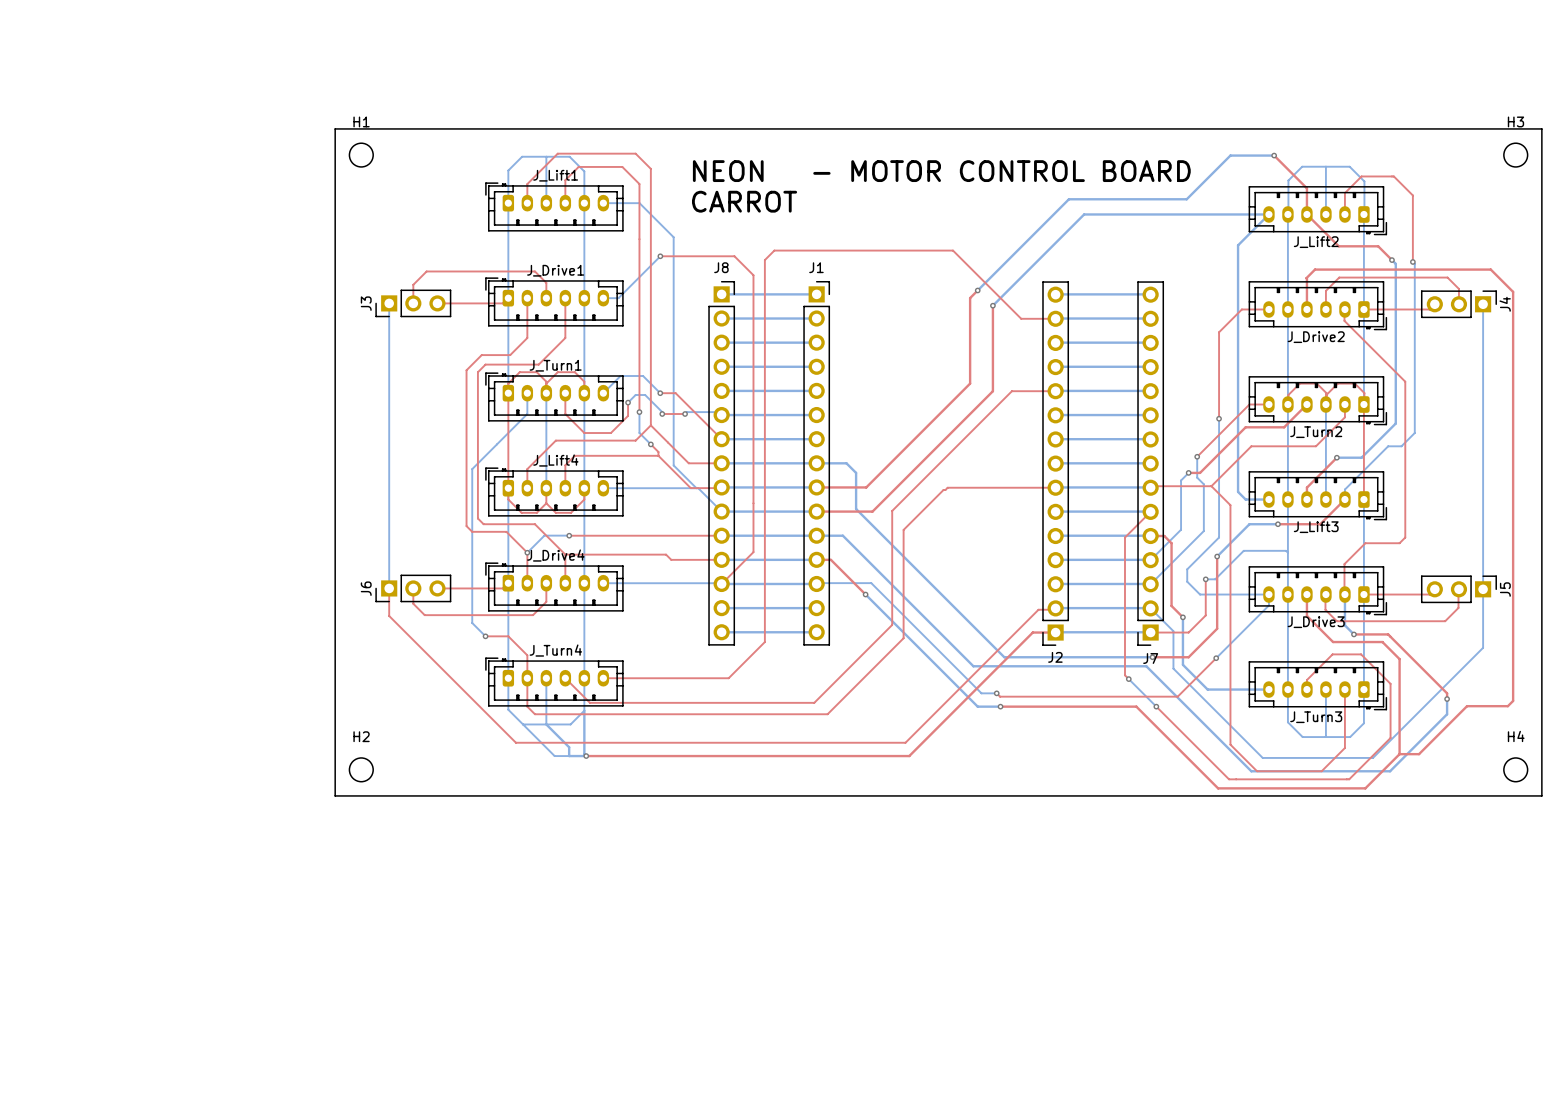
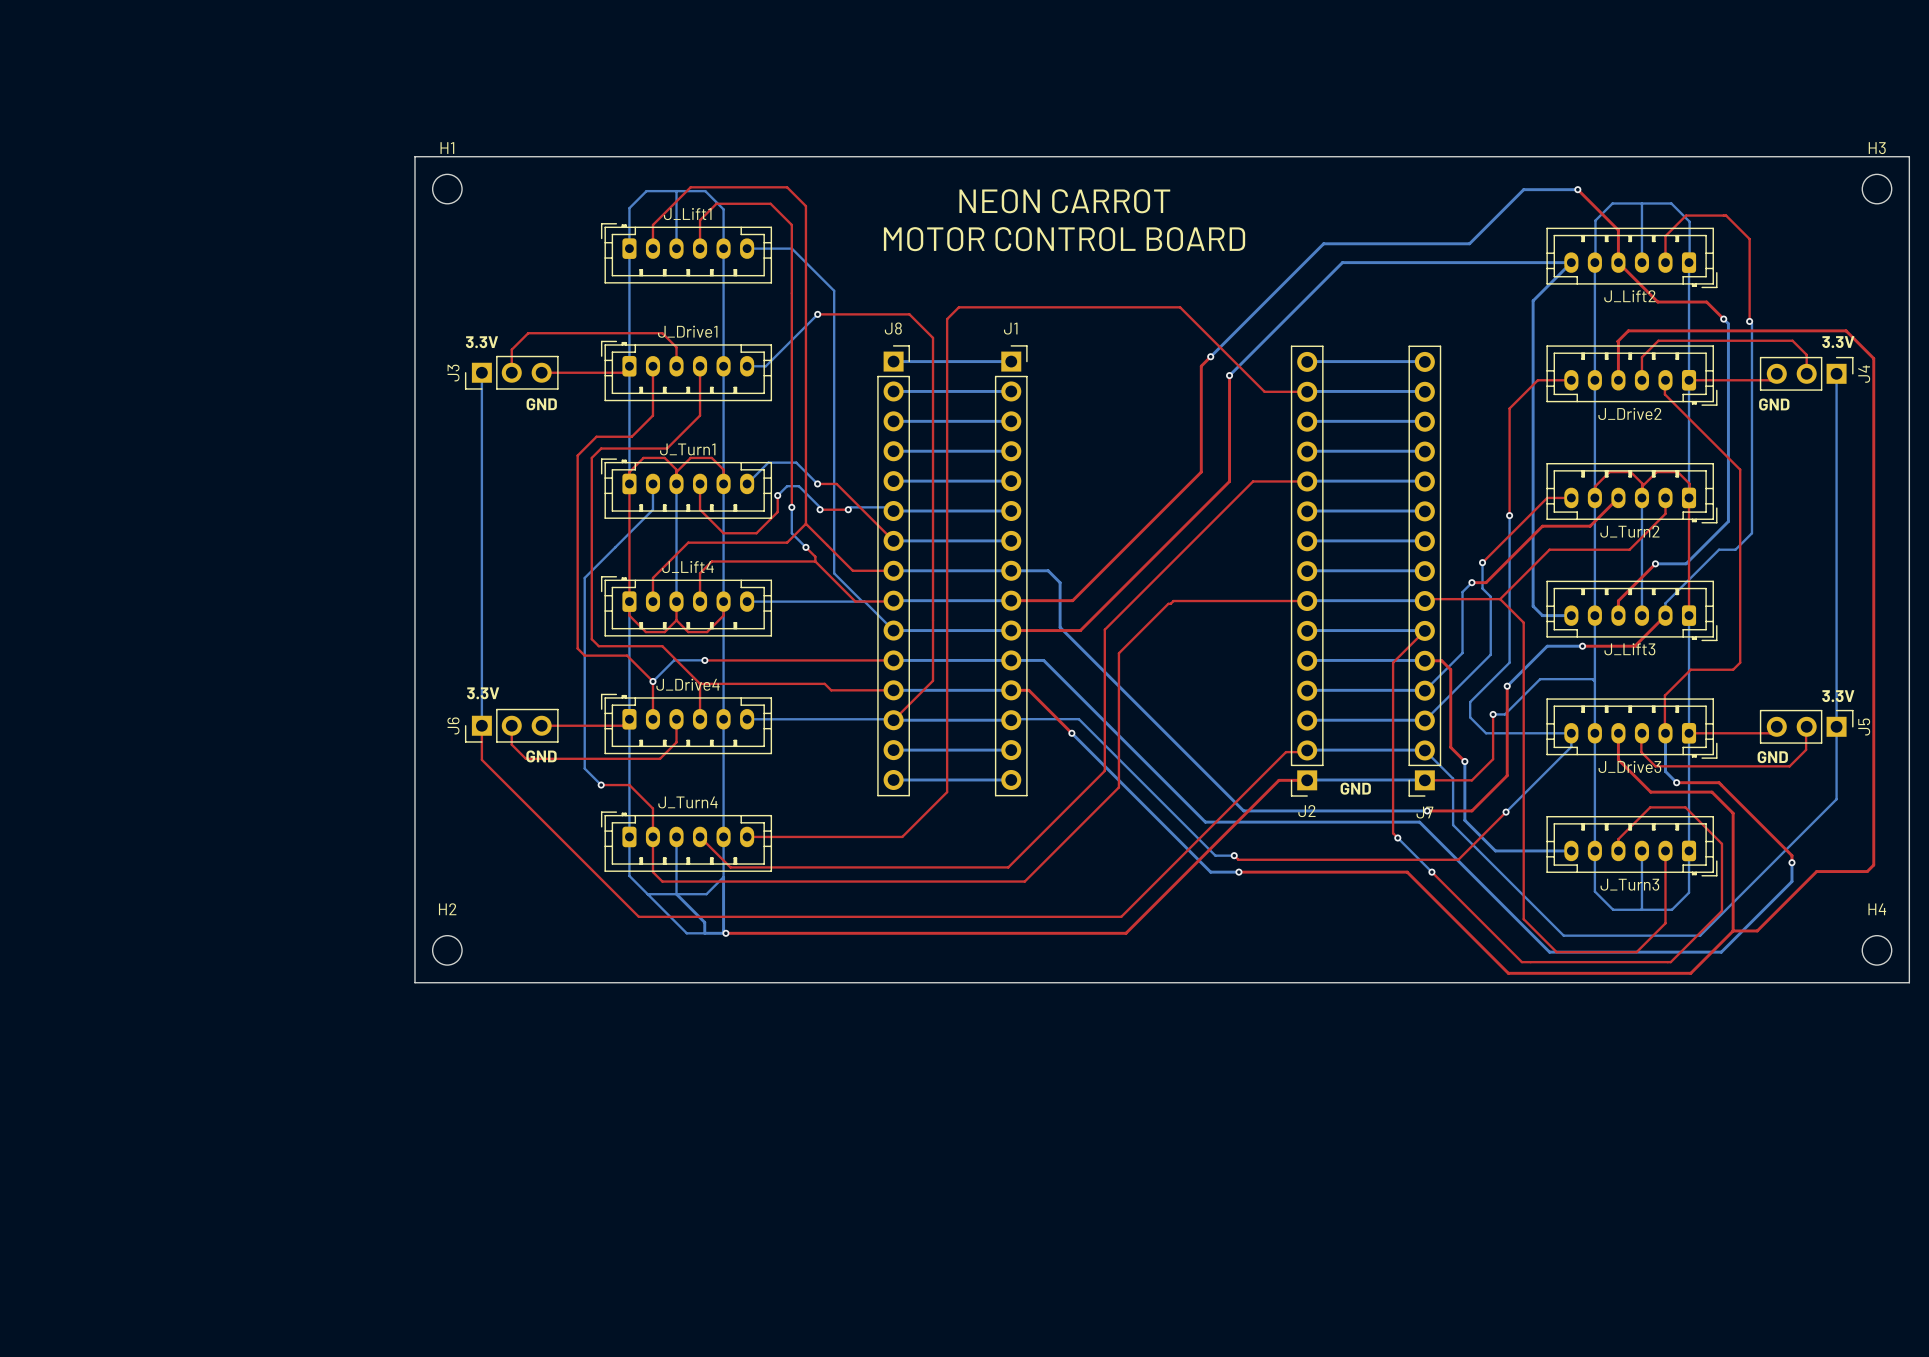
text: NEON - MOTOR CONTROL BOARD (941, 171) -> MOTOR CONTROL BOARD (1064, 239)
text: CARROT (744, 201) -> NEON CARROT (1064, 201)
text: none -> 3.3V (481, 342)
text: none -> 3.3V (1838, 342)
text: none -> GND (541, 404)
text: none -> GND (1774, 404)
text: none -> 3.3V (483, 693)
text: none -> 3.3V (1838, 696)
text: none -> GND (541, 756)
text: none -> GND (1772, 757)
text: none -> GND (1355, 788)

